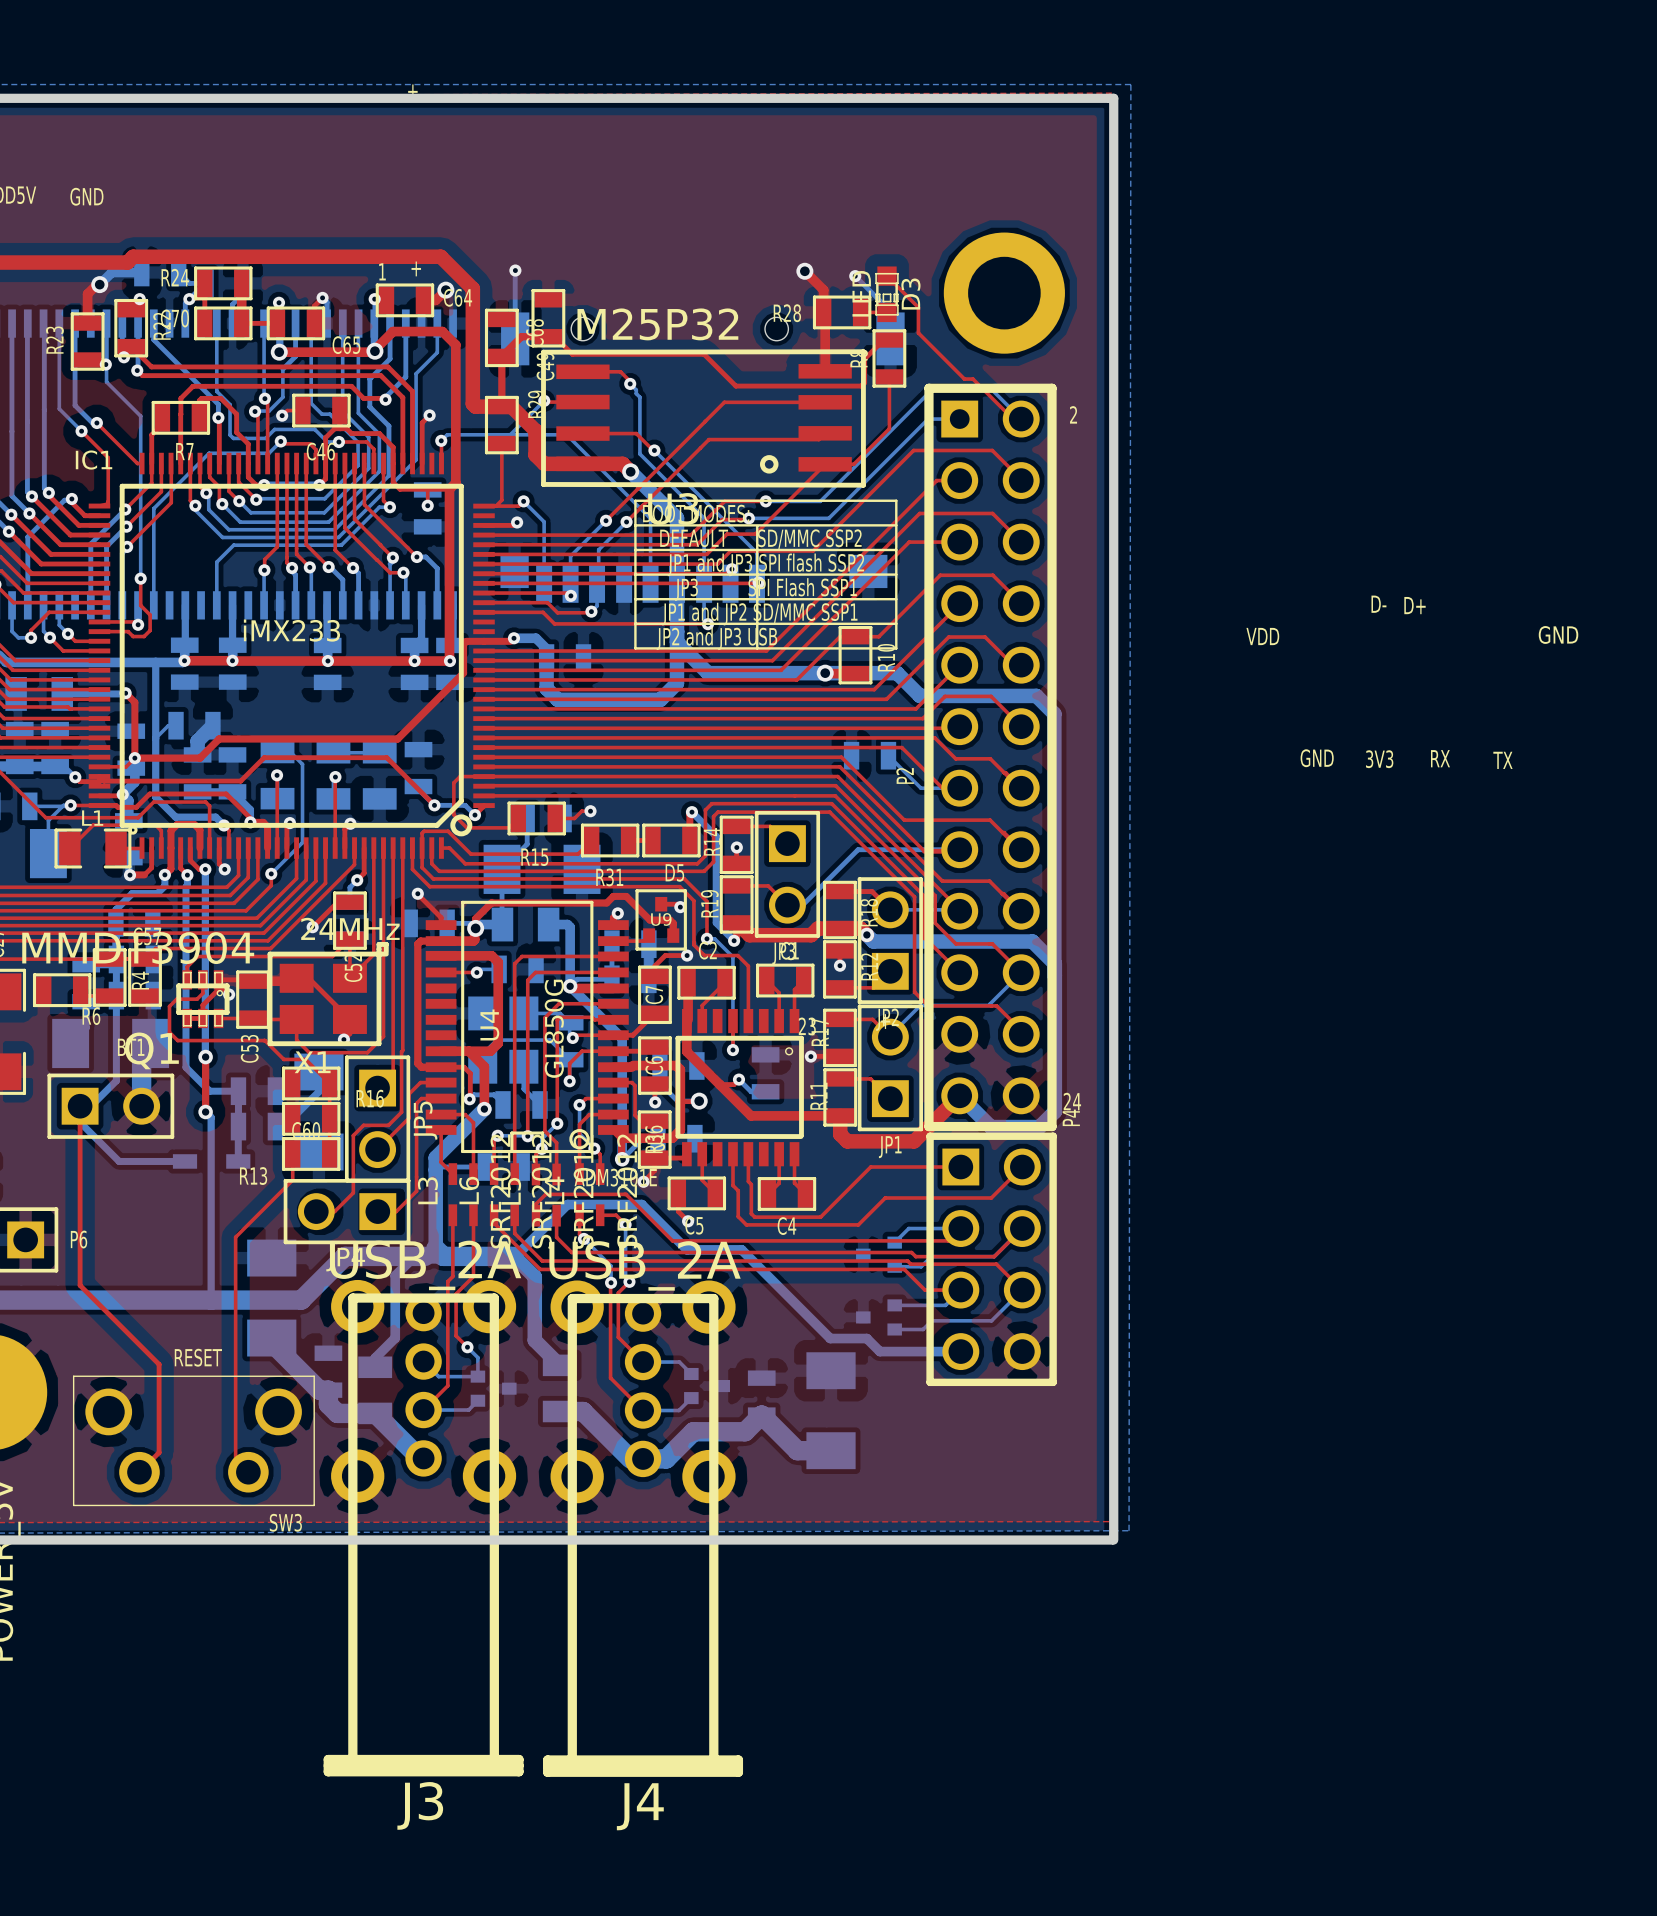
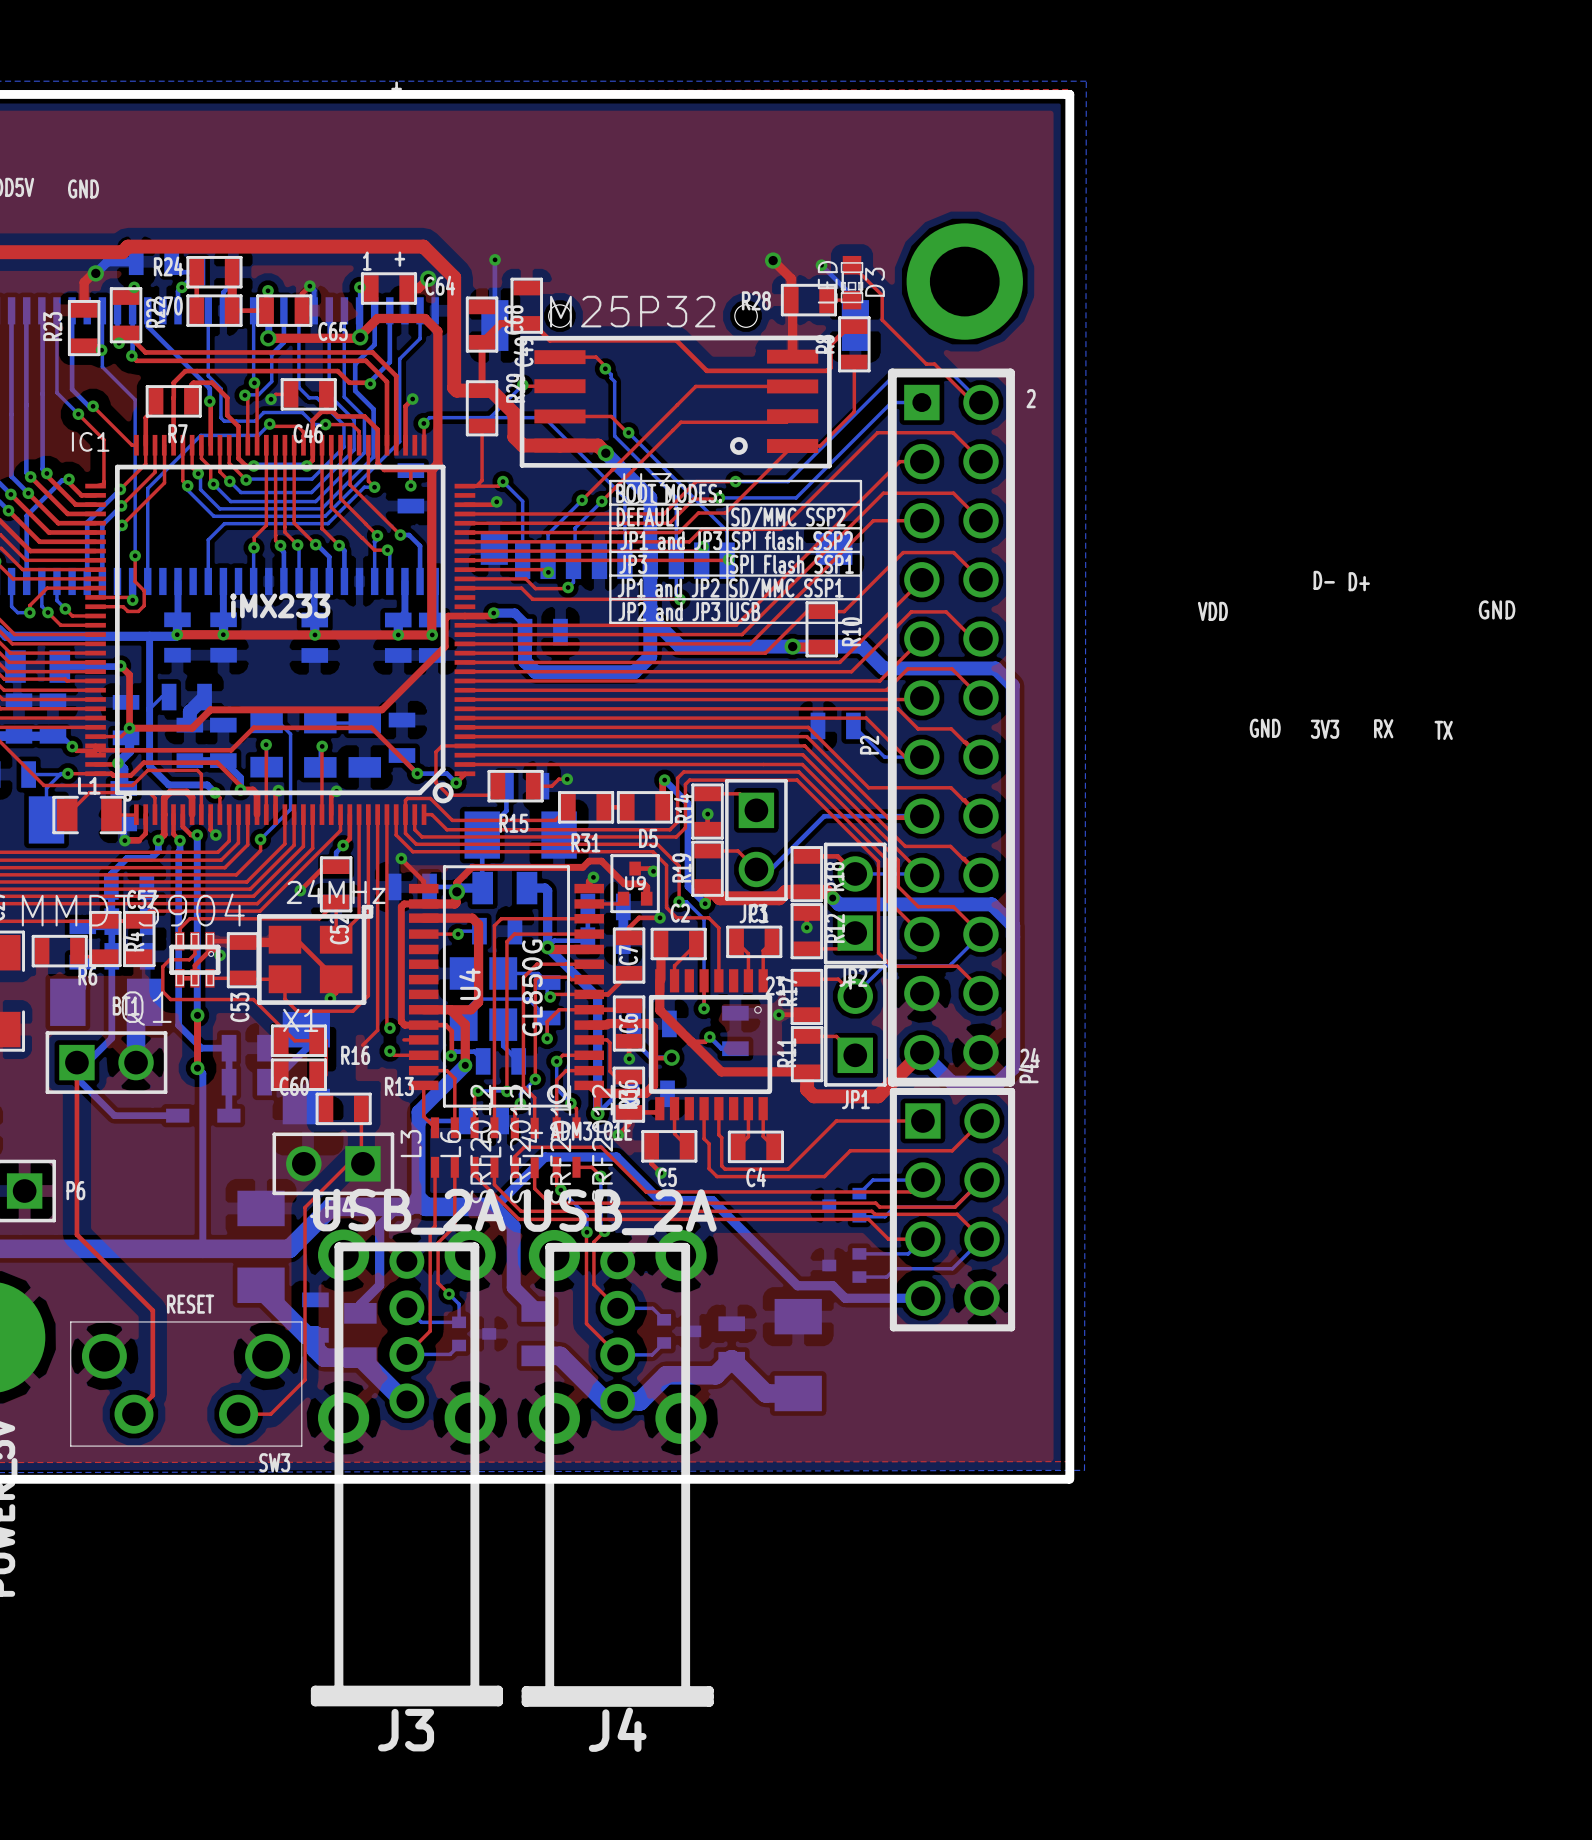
top track: (264, 1040) (283, 1059) (305, 1059) (329, 1083) (329, 1153) -> (253, 999) (294, 1040) (326, 1040) (326, 1075)
top track: (402, 1050) (401, 1112) (388, 1125) (363, 1125) (353, 1135) (353, 1192) (334, 1211) (316, 1211) -> (386, 1009) (386, 1025) (389, 1028)
via: none -> (389, 1028)
top track: (420, 1082) (409, 1094) (409, 1118) (377, 1149) -> none
via: none -> (389, 1051)
top track: (421, 1098) (416, 1103) (416, 1191) (396, 1211) (377, 1211) -> (404, 1055) (394, 1055) (389, 1051)
JP5: (377, 1118) -> none
top track: (292, 1153) (292, 1180) (235, 1237) (235, 1459) (248, 1472) -> (361, 1108) (361, 1151) (305, 1207) (305, 1379) (270, 1414) (238, 1414)
R13 position: (311, 1153) -> (343, 1108)
R13 name position: R13 (253, 1176) -> R13 (399, 1086)

